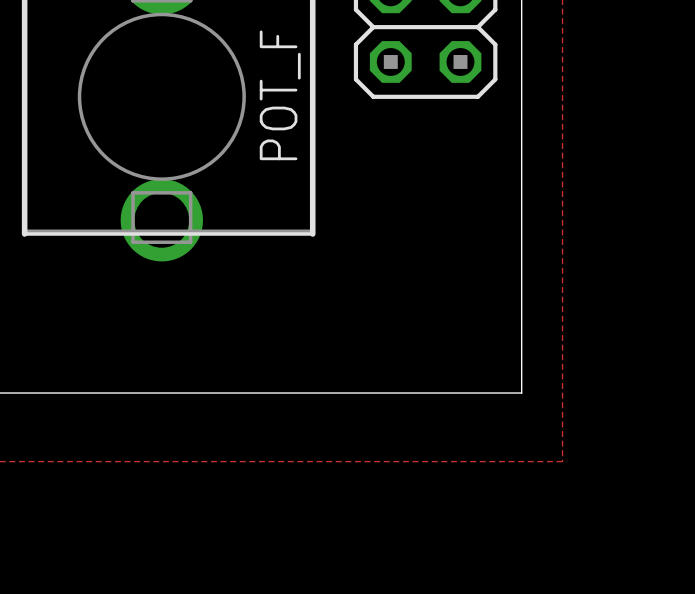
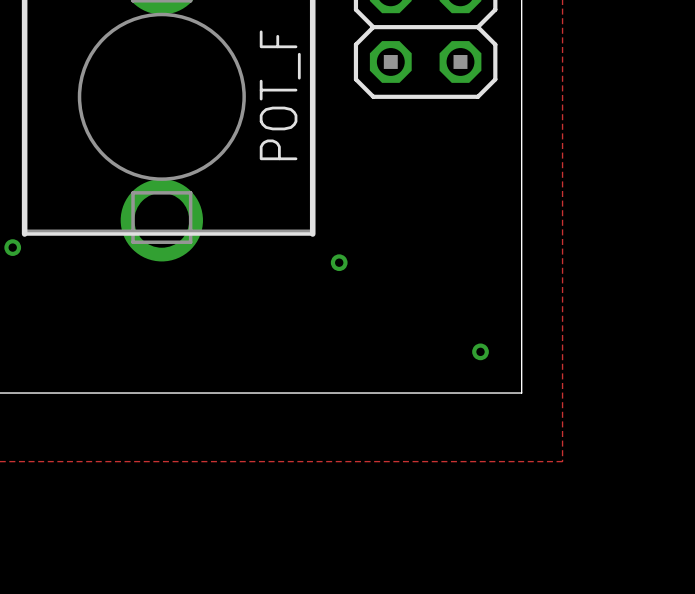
via: none -> (12, 247)
via: none -> (339, 262)
via: none -> (480, 351)

